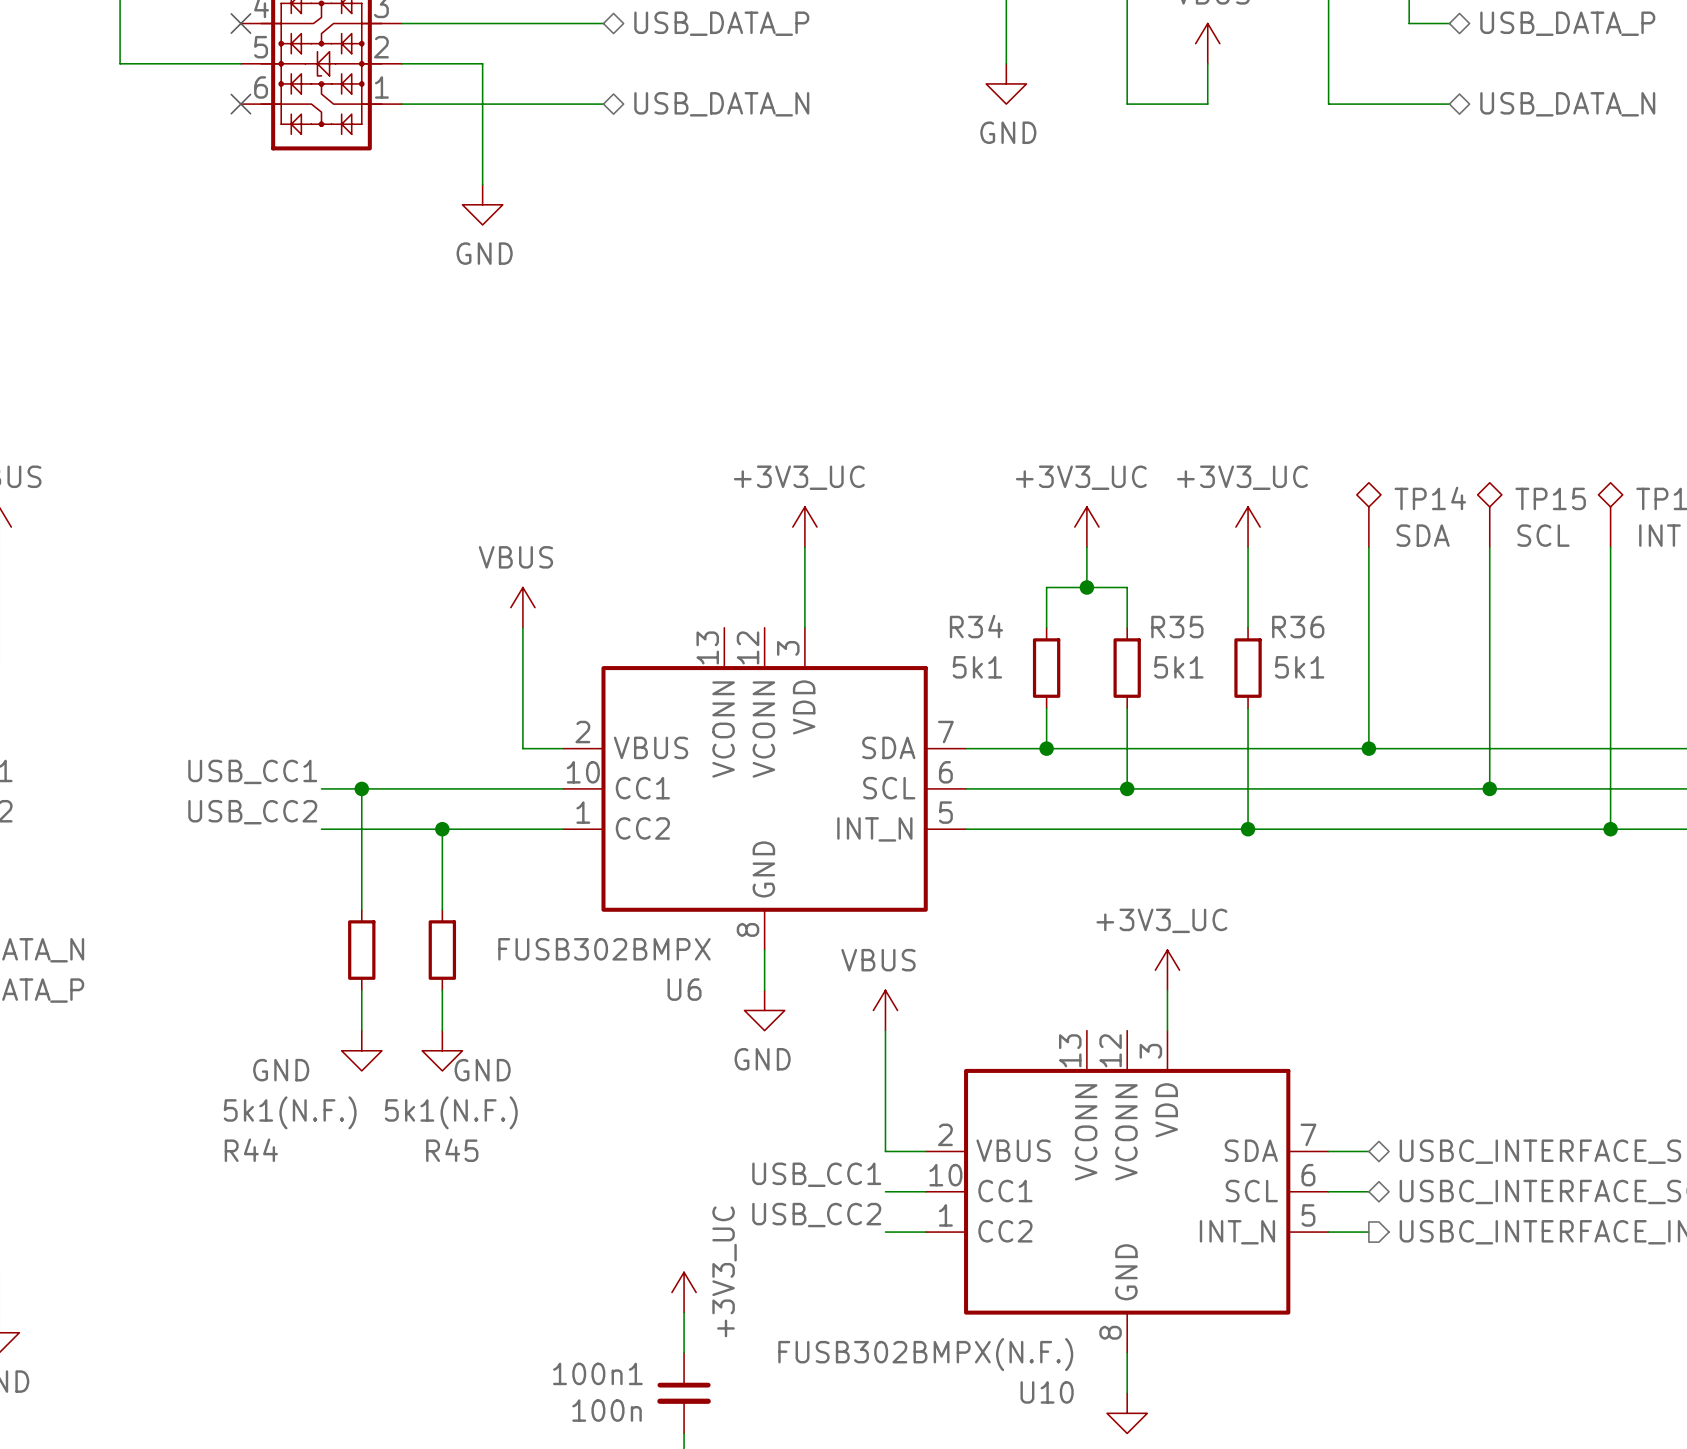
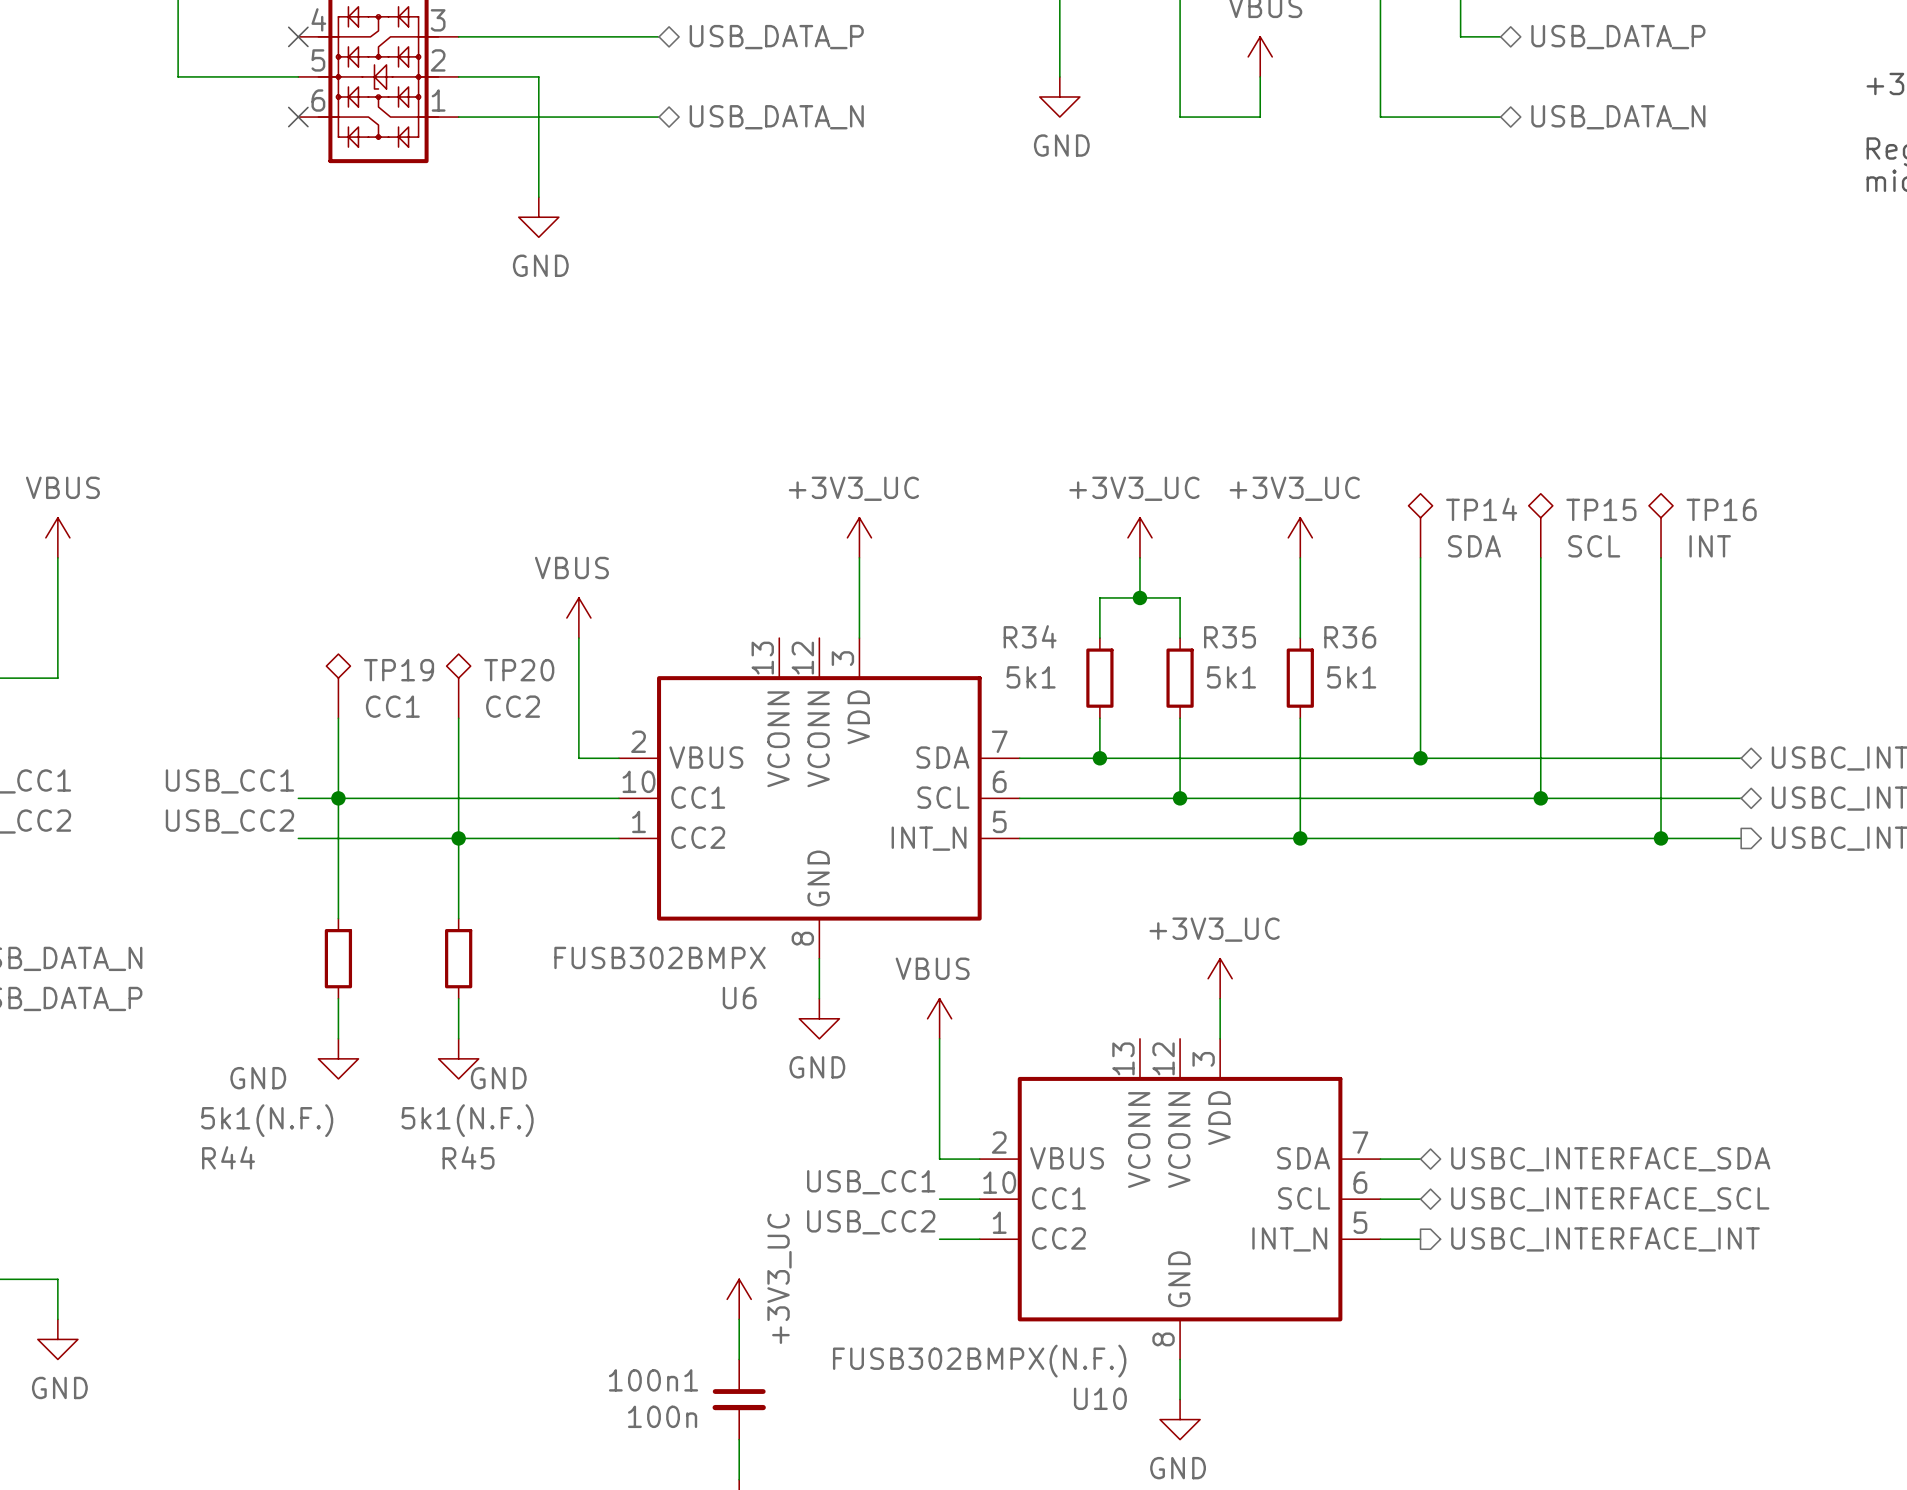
TP19: none -> CC1 (338, 686)
TP20: none -> CC2 (458, 686)
wire: none -> (338, 718) (338, 918)
wire: none -> (458, 718) (458, 918)
label position: USB_CC1 (252, 771) -> USB_CC1 (229, 781)
wire: none -> (298, 798) (378, 798)
junction: none -> (338, 798)
wire: (361, 788) (361, 909) -> none
junction: (361, 788) -> none
label position: USB_CC2 (252, 812) -> USB_CC2 (229, 821)
wire: none -> (298, 838) (378, 838)
junction: none -> (458, 838)
wire: (442, 829) (442, 909) -> none
junction: (442, 829) -> none
R44 position: (361, 950) -> (338, 958)
R45 position: (442, 950) -> (458, 958)
wire: (361, 990) (361, 1030) -> (458, 998) (458, 1038)
wire: (442, 990) (442, 1030) -> (338, 998) (338, 1038)
power symbol: none -> GND (338, 1058)
power symbol: GND (361, 1050) -> none
power symbol: none -> GND (458, 1058)
power symbol: GND (442, 1050) -> none

